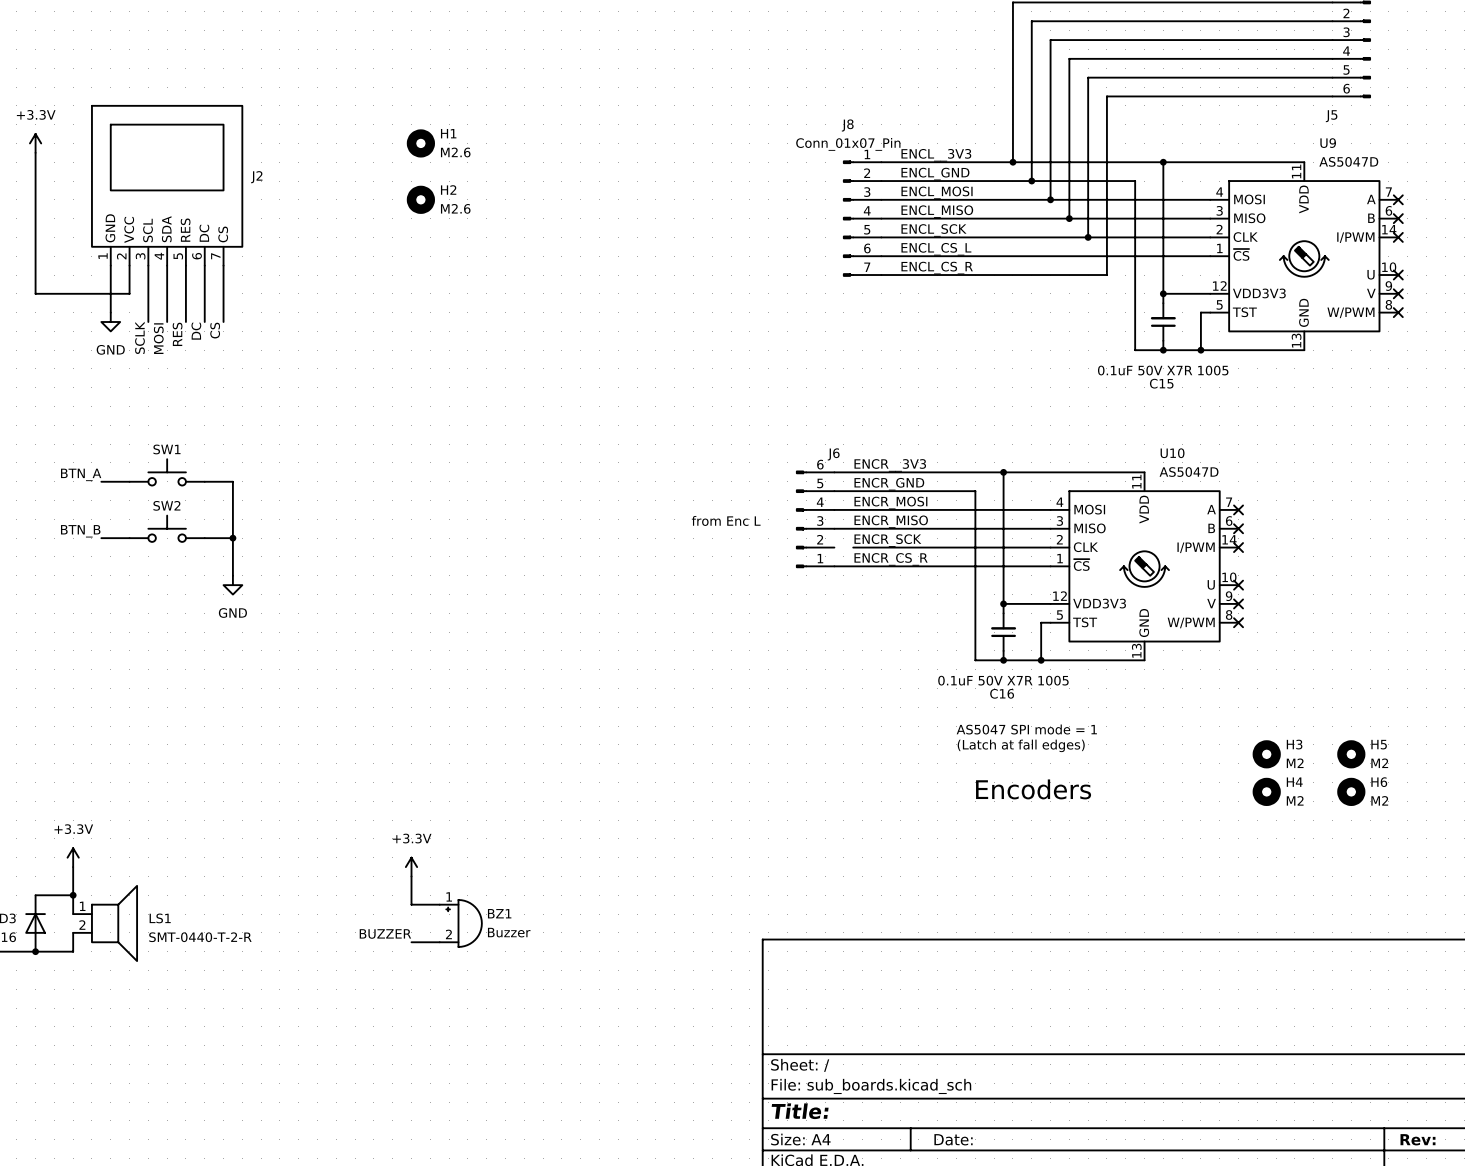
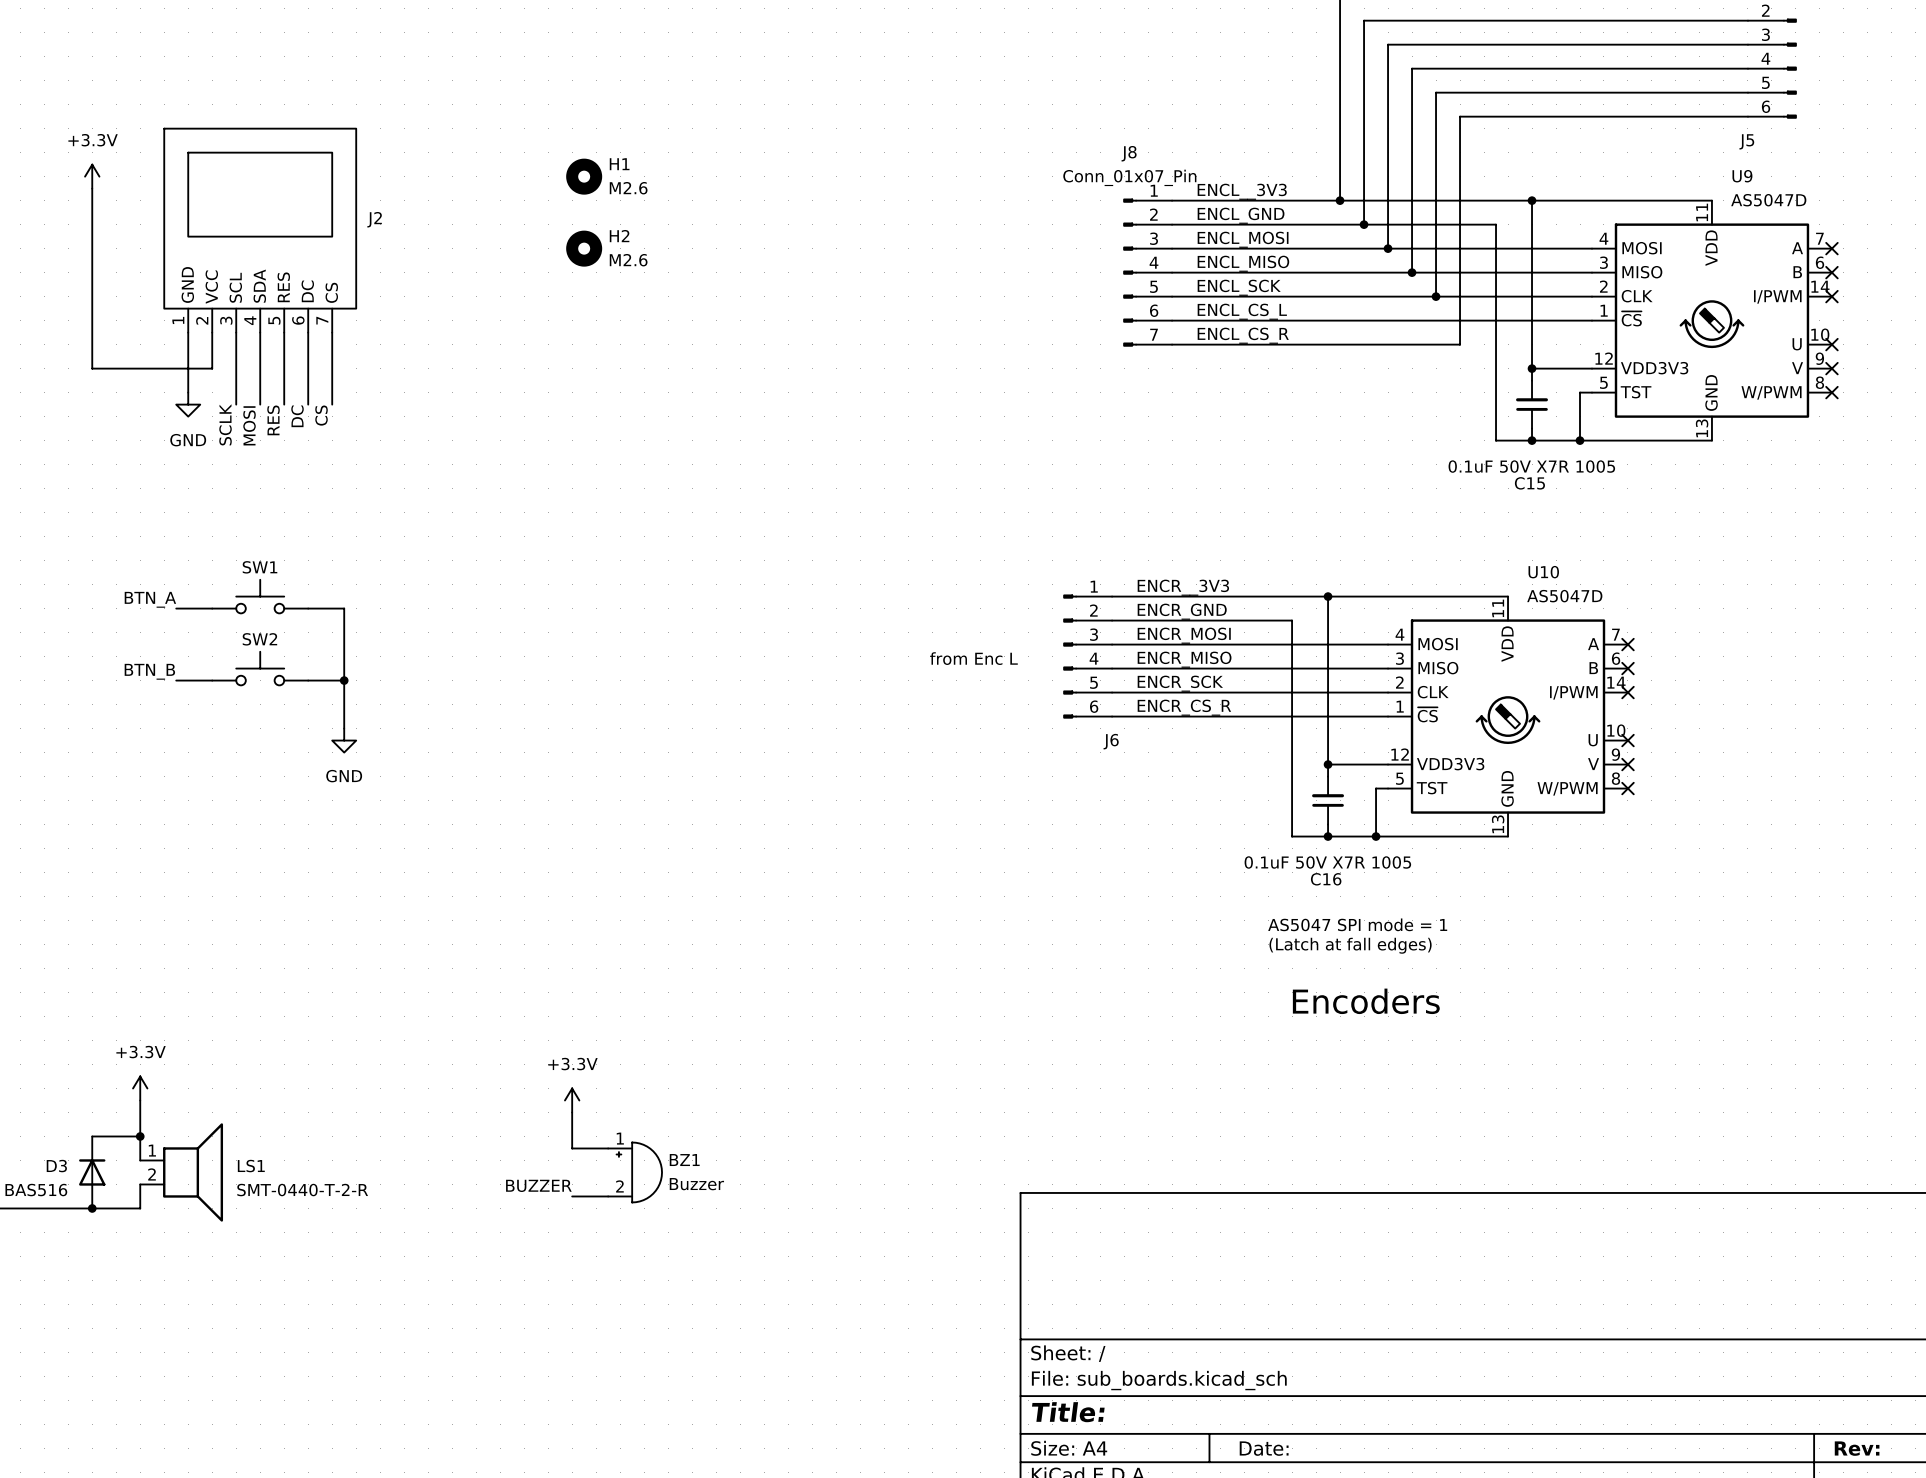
J6 flip: as is (801, 519) -> up-down (1070, 656)
wire: none -> (1112, 692) (1136, 692)
H3: M2 (1266, 754) -> none
H5: M2 (1351, 754) -> none
H4: M2 (1266, 791) -> none
H6: M2 (1351, 791) -> none

